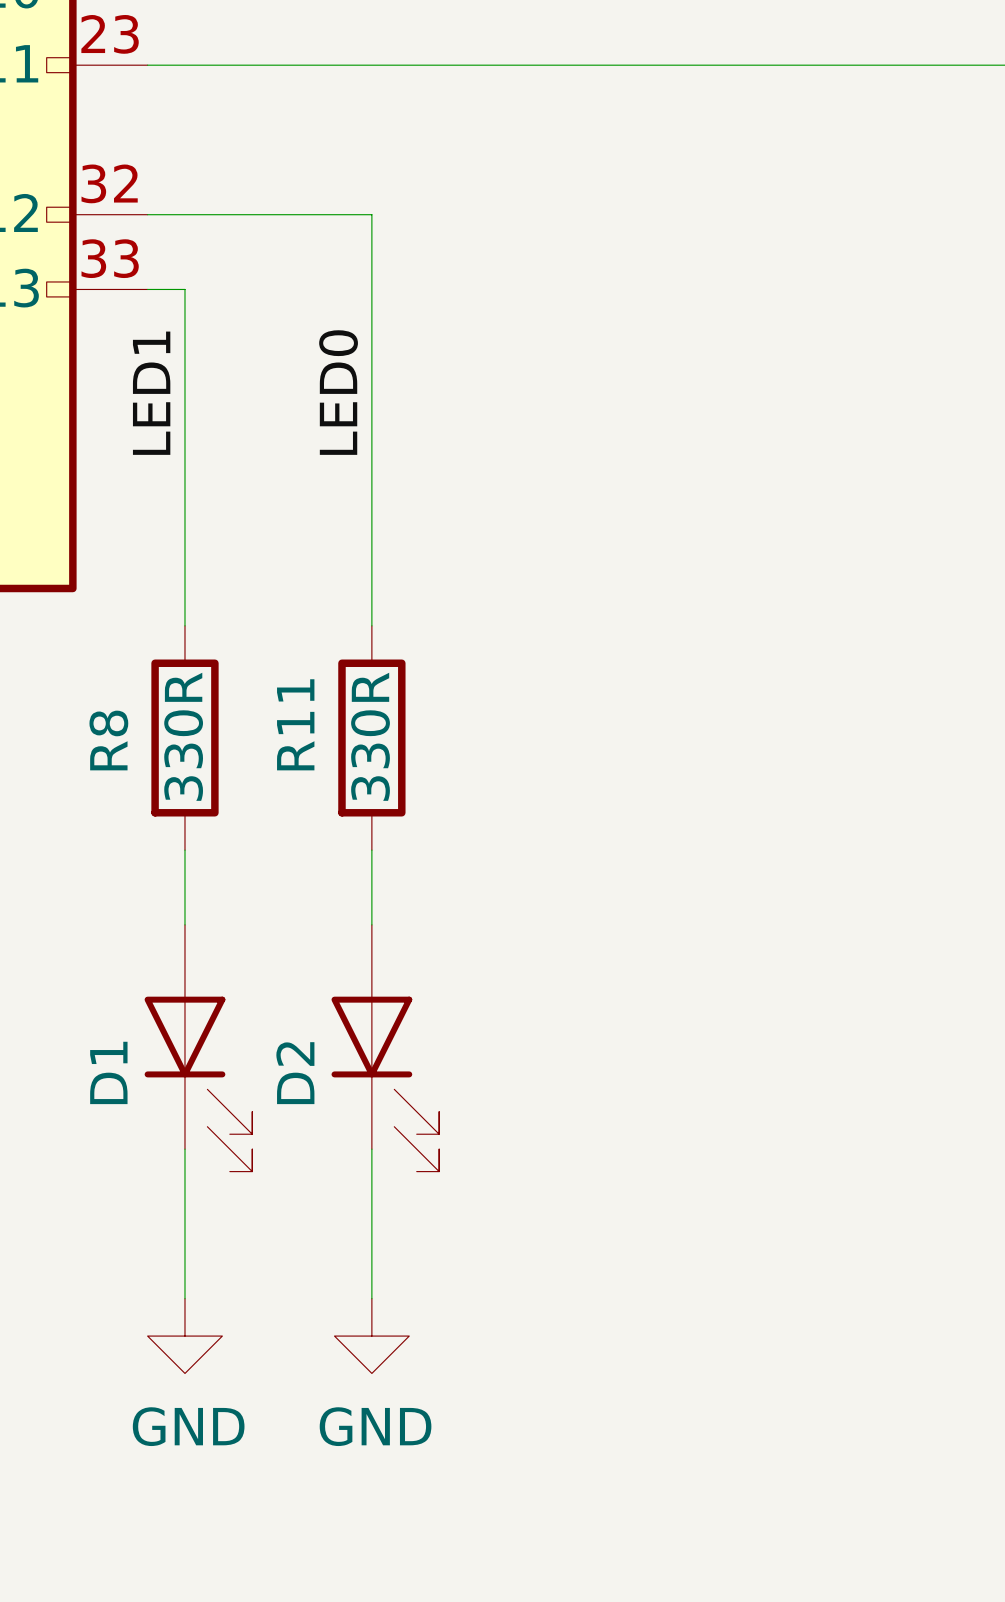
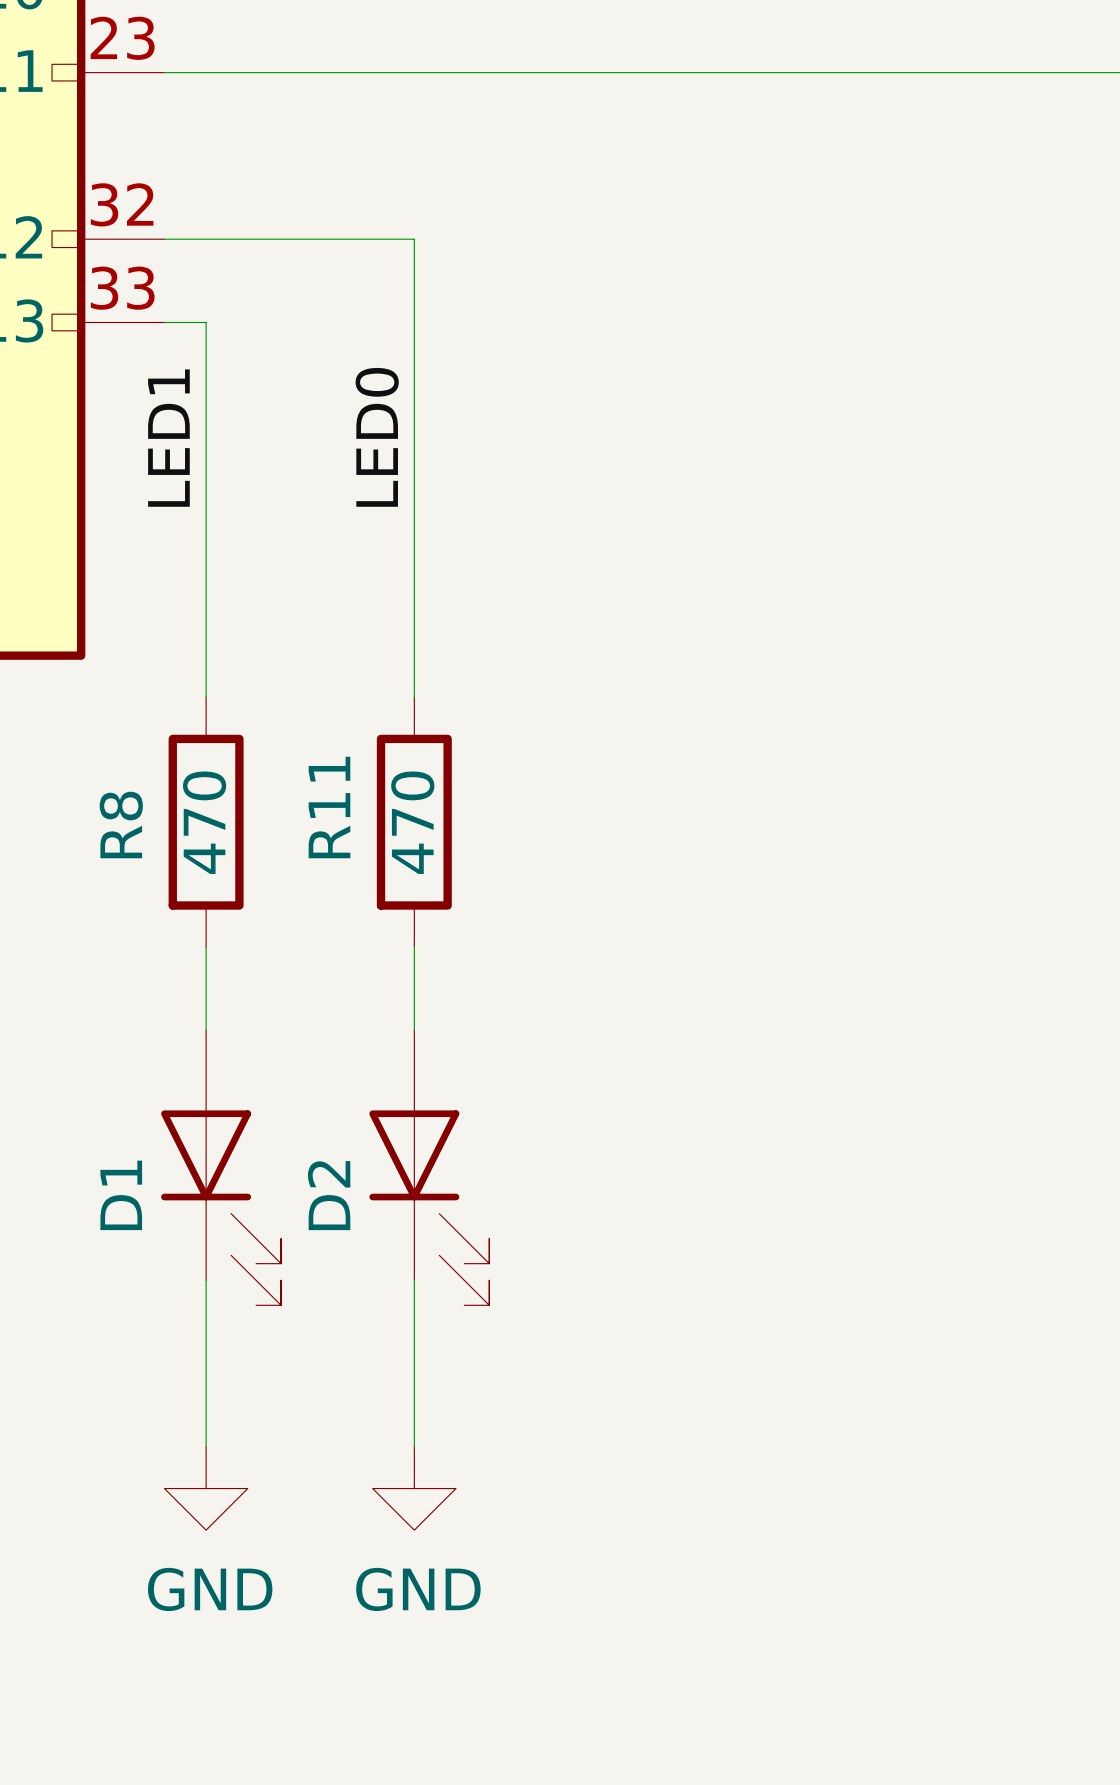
R8 value: 330R (183, 736) -> 470 (204, 822)
R11 value: 330R (370, 736) -> 470 (412, 822)

